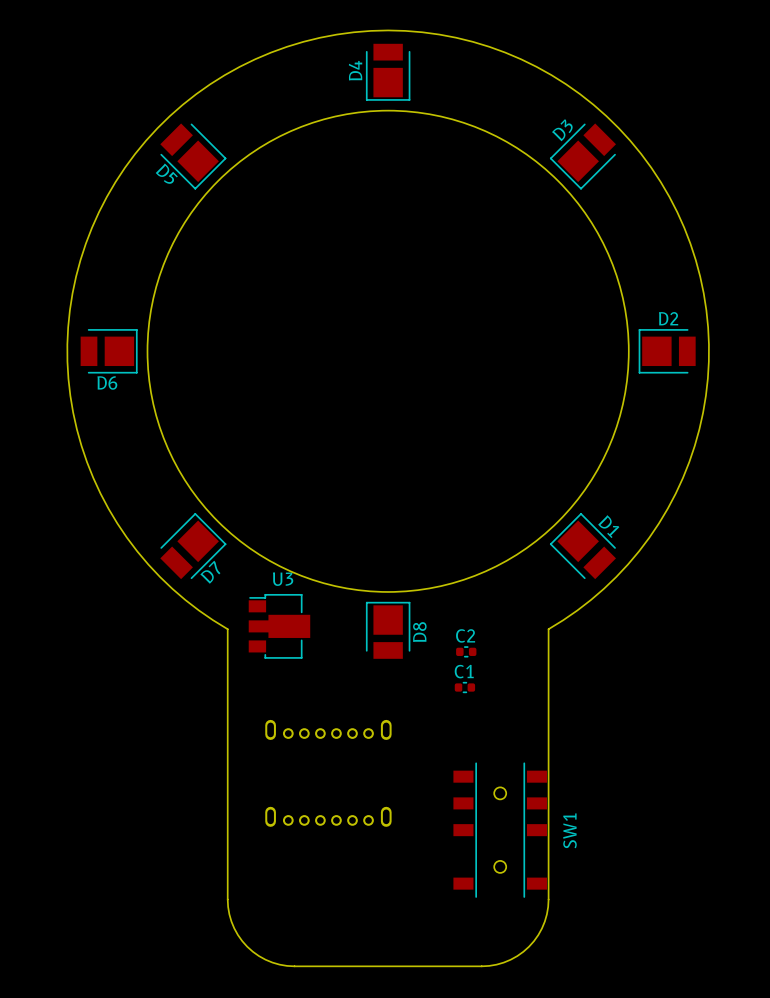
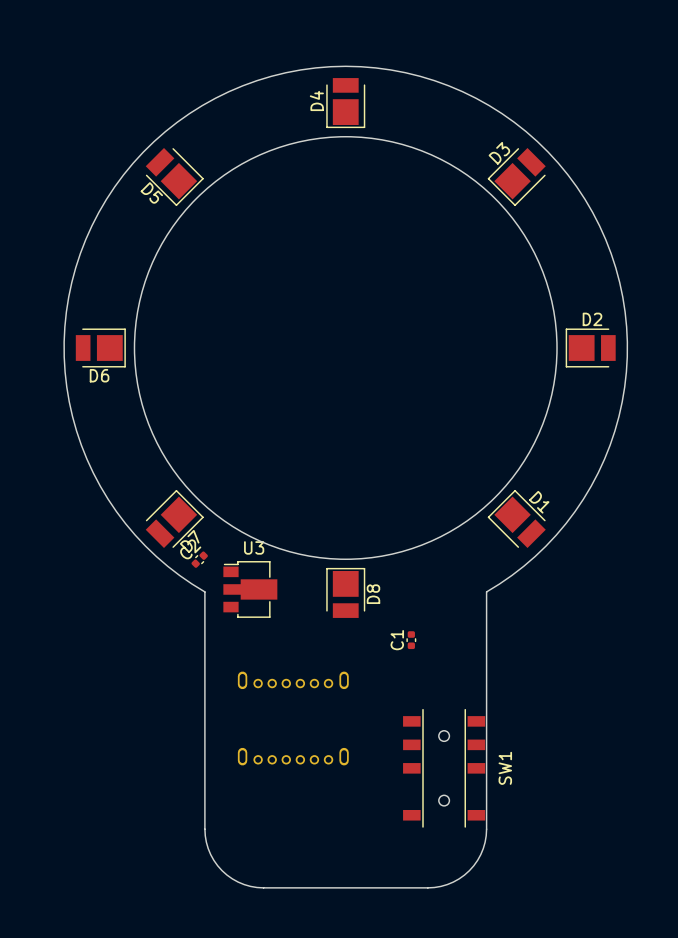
C2 rotation: 0° (466, 651) -> 45° counterclockwise (199, 559)
C2 position: (466, 651) -> (199, 559)
C1 rotation: 0° (464, 687) -> 90° clockwise (411, 640)

